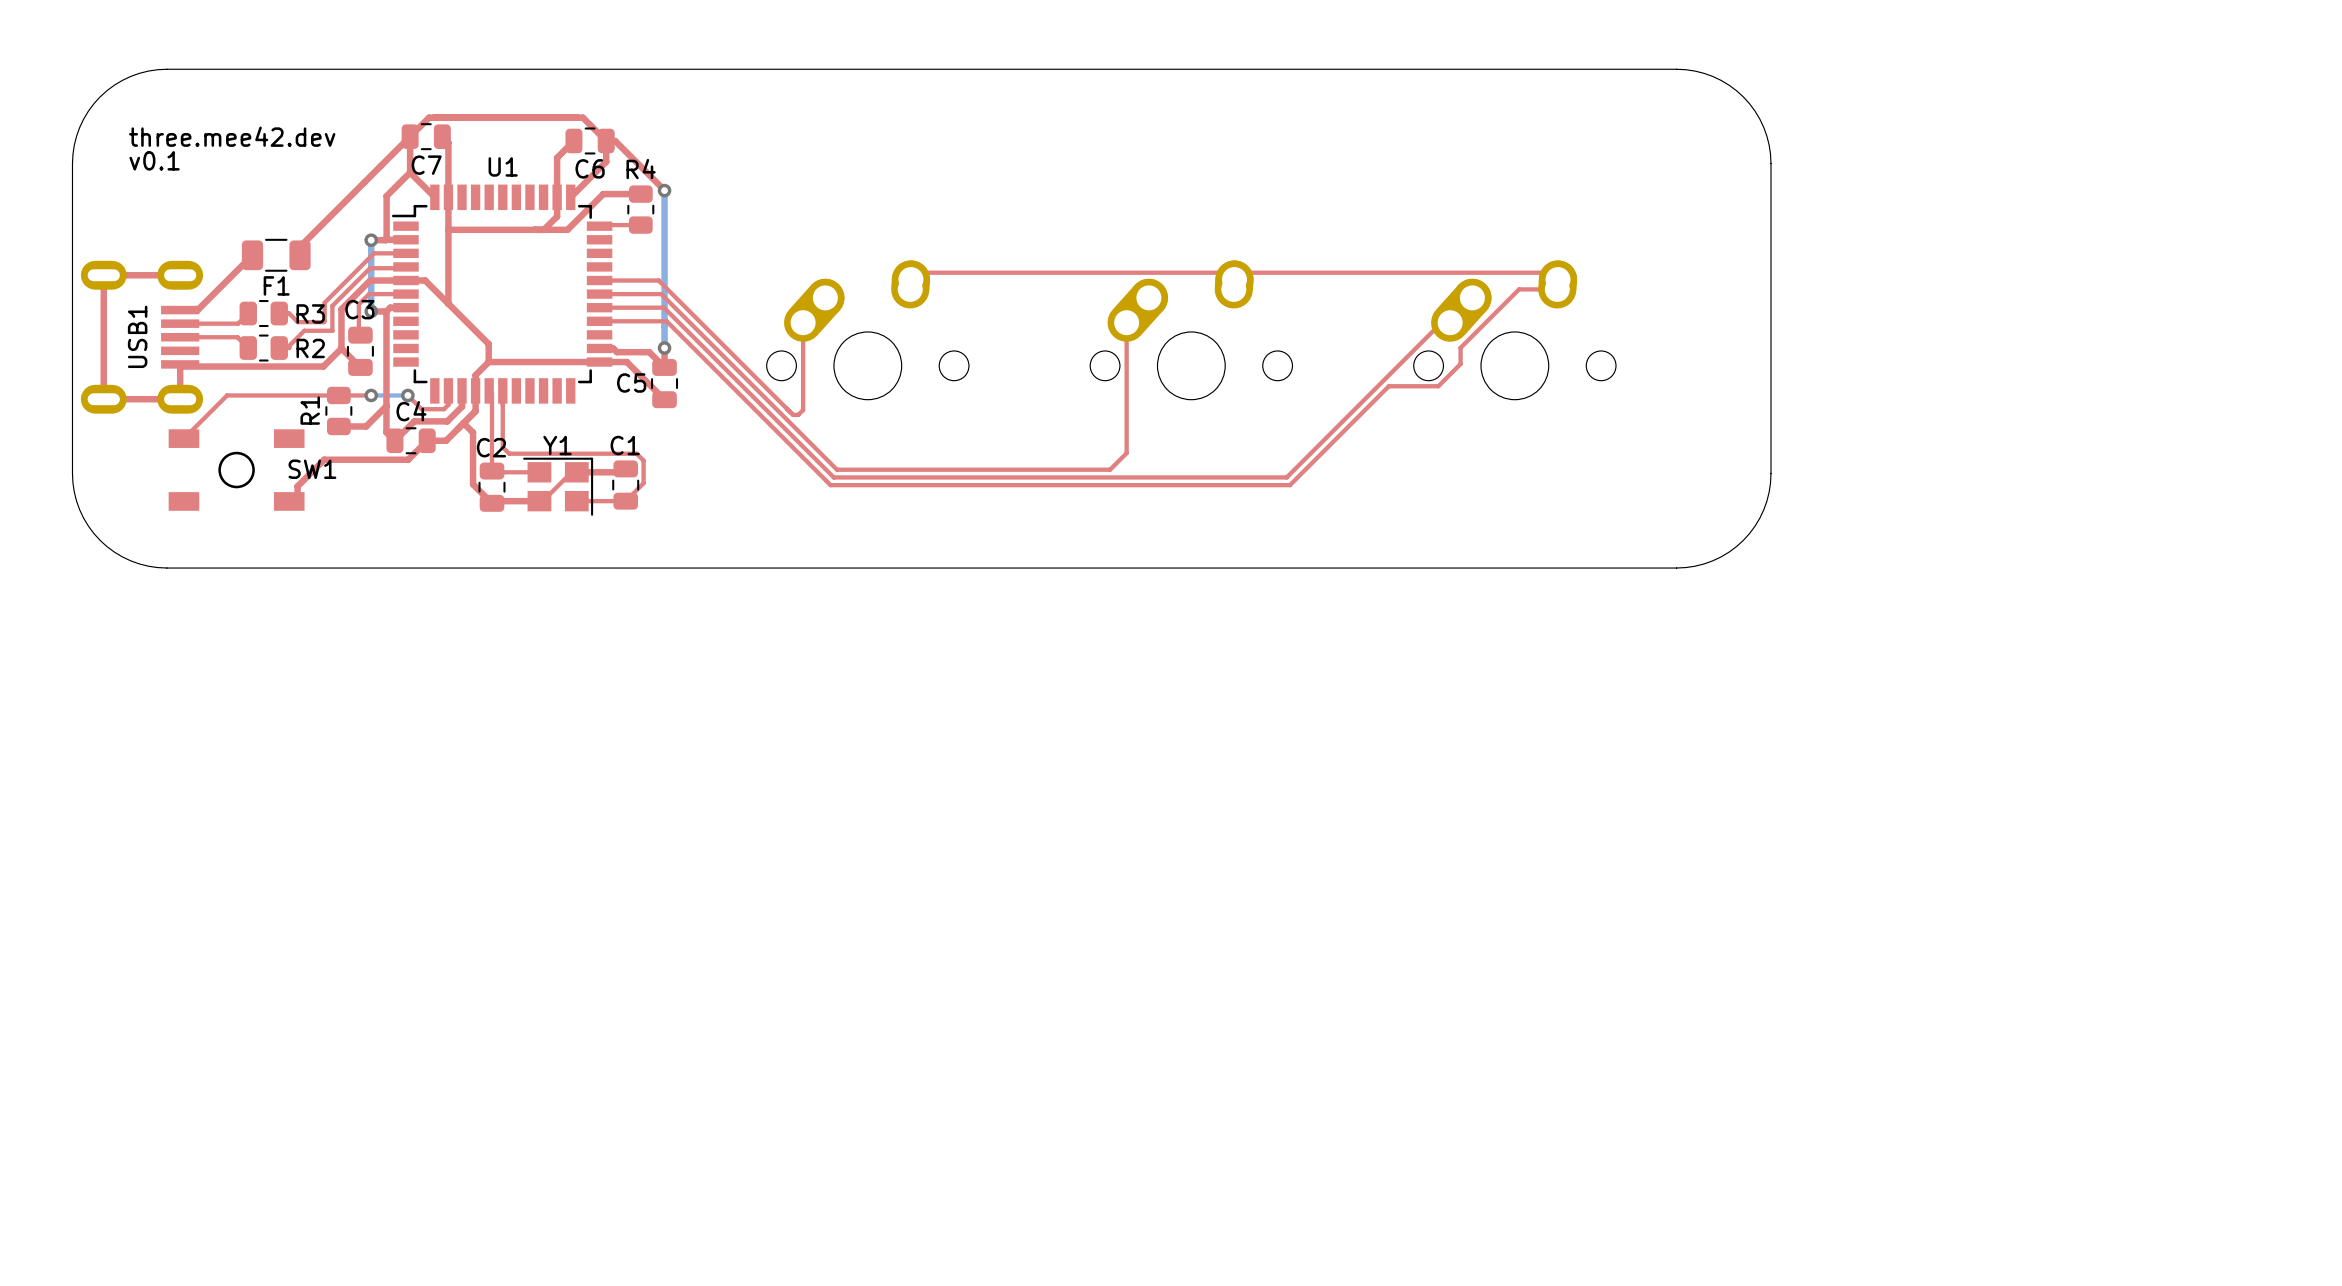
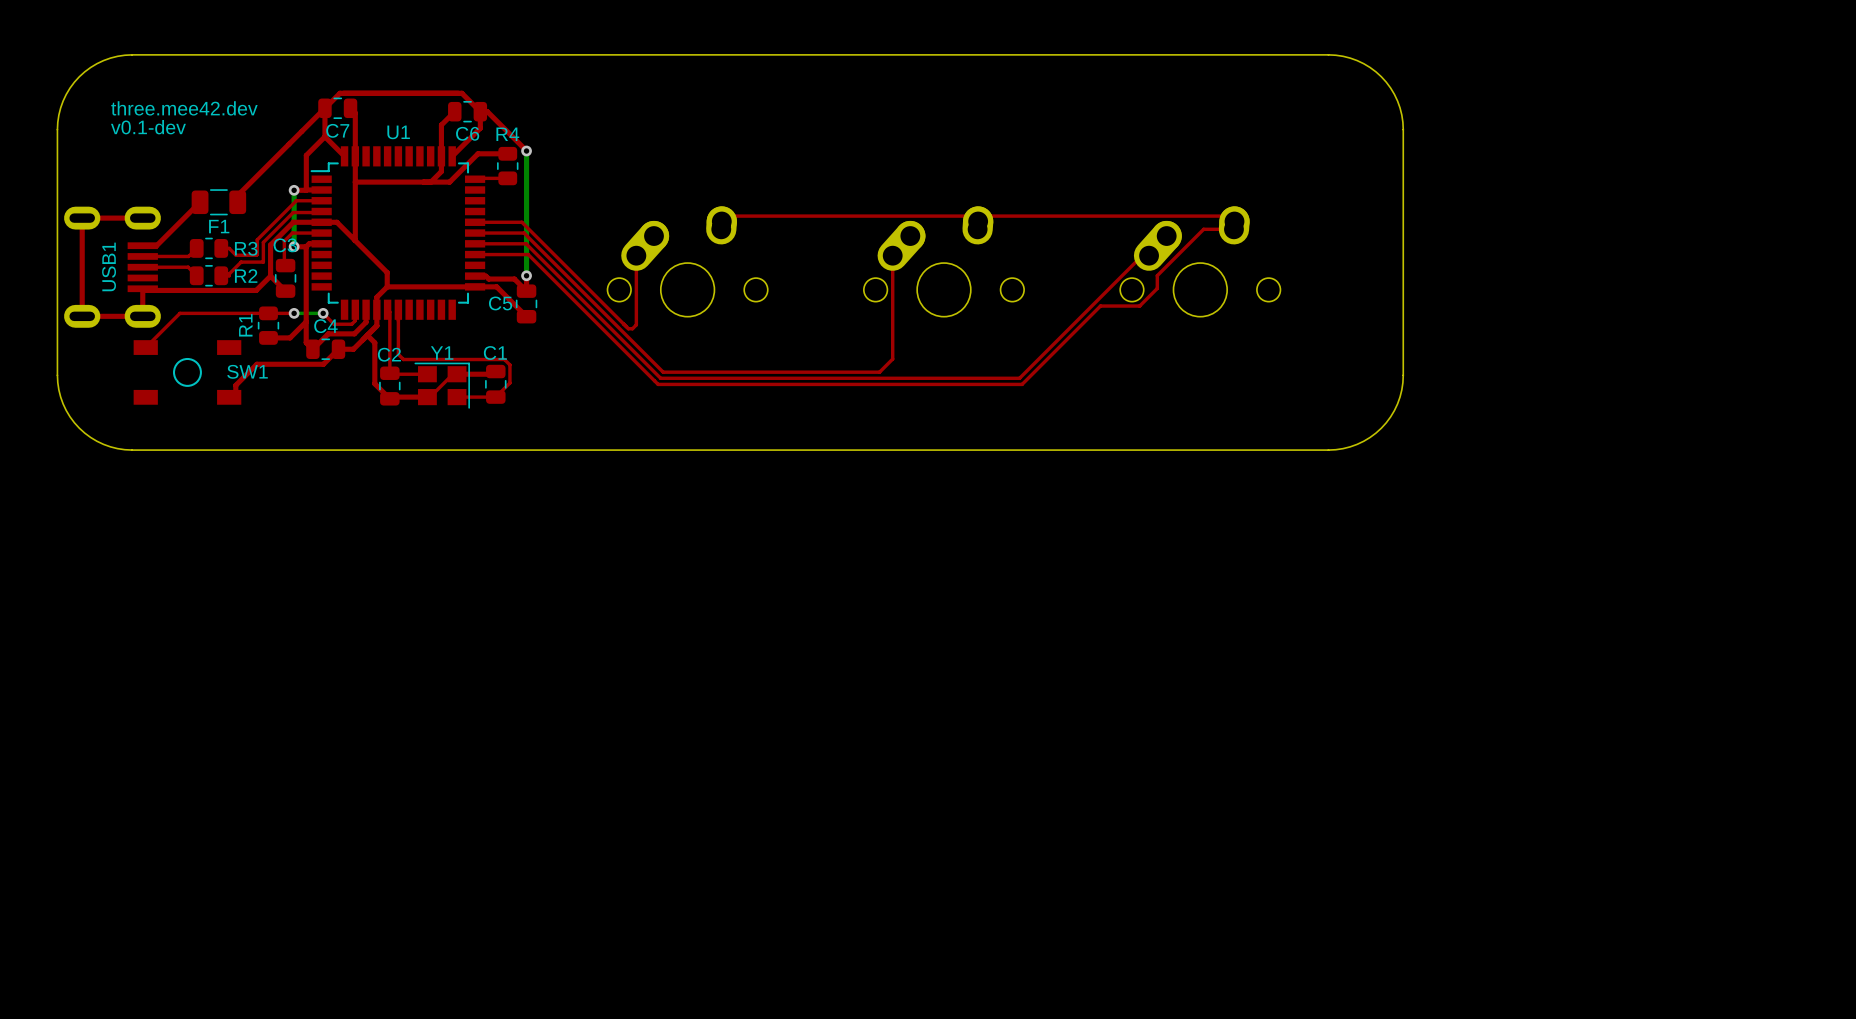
text: v0.1 (154, 160) -> v0.1-dev (148, 127)

